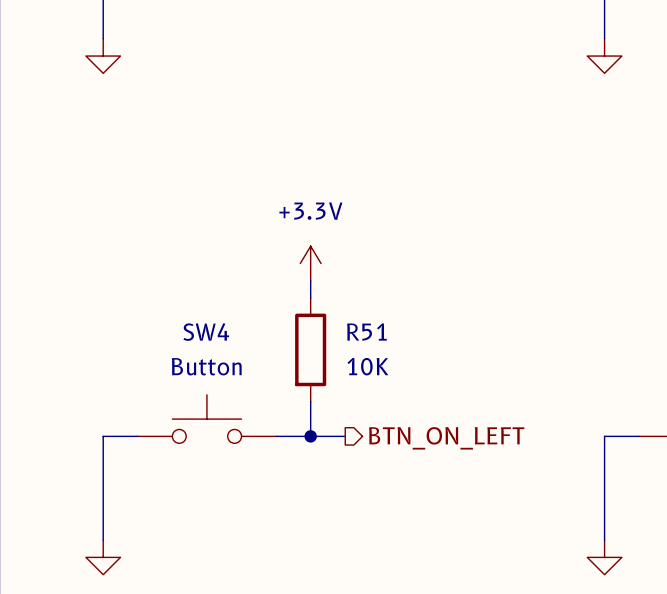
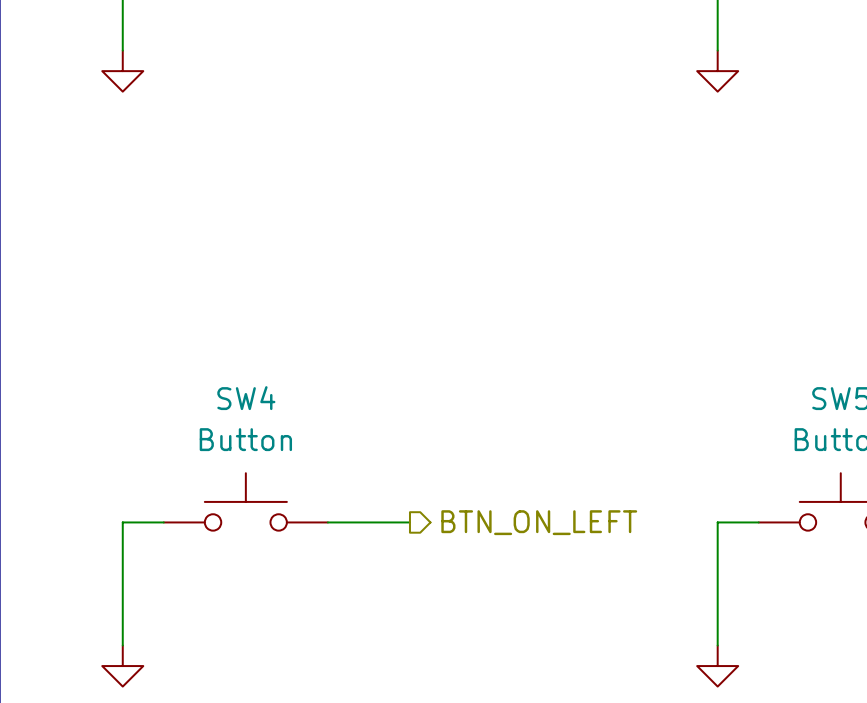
power symbol: +3.3V (310, 263) -> none
wire: (310, 280) (310, 298) -> none
R51: 10K (310, 349) -> none
wire: (310, 401) (310, 436) -> none
junction: (310, 436) -> none

